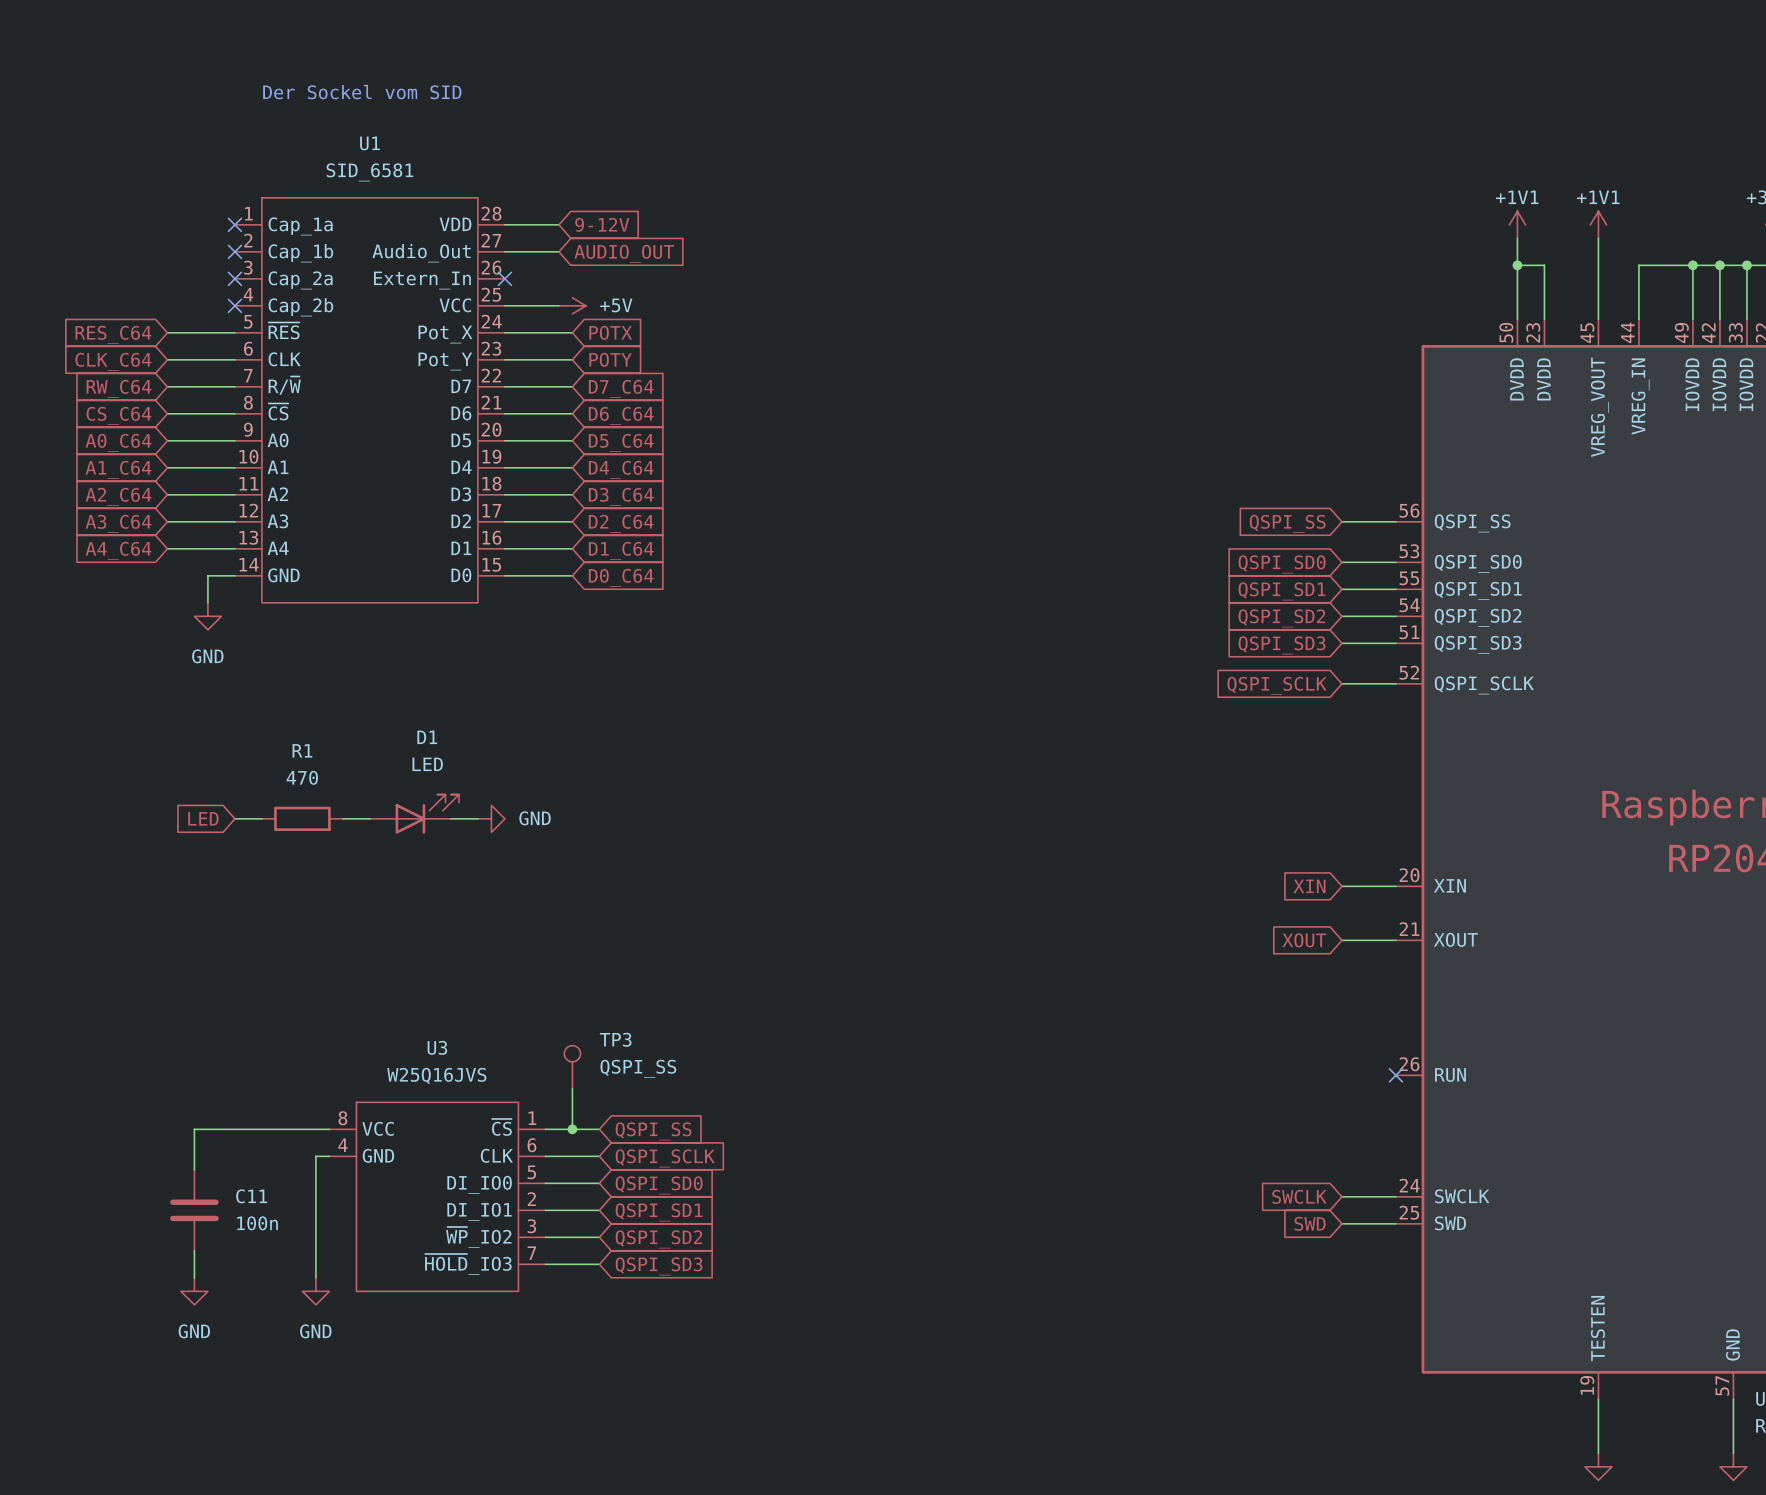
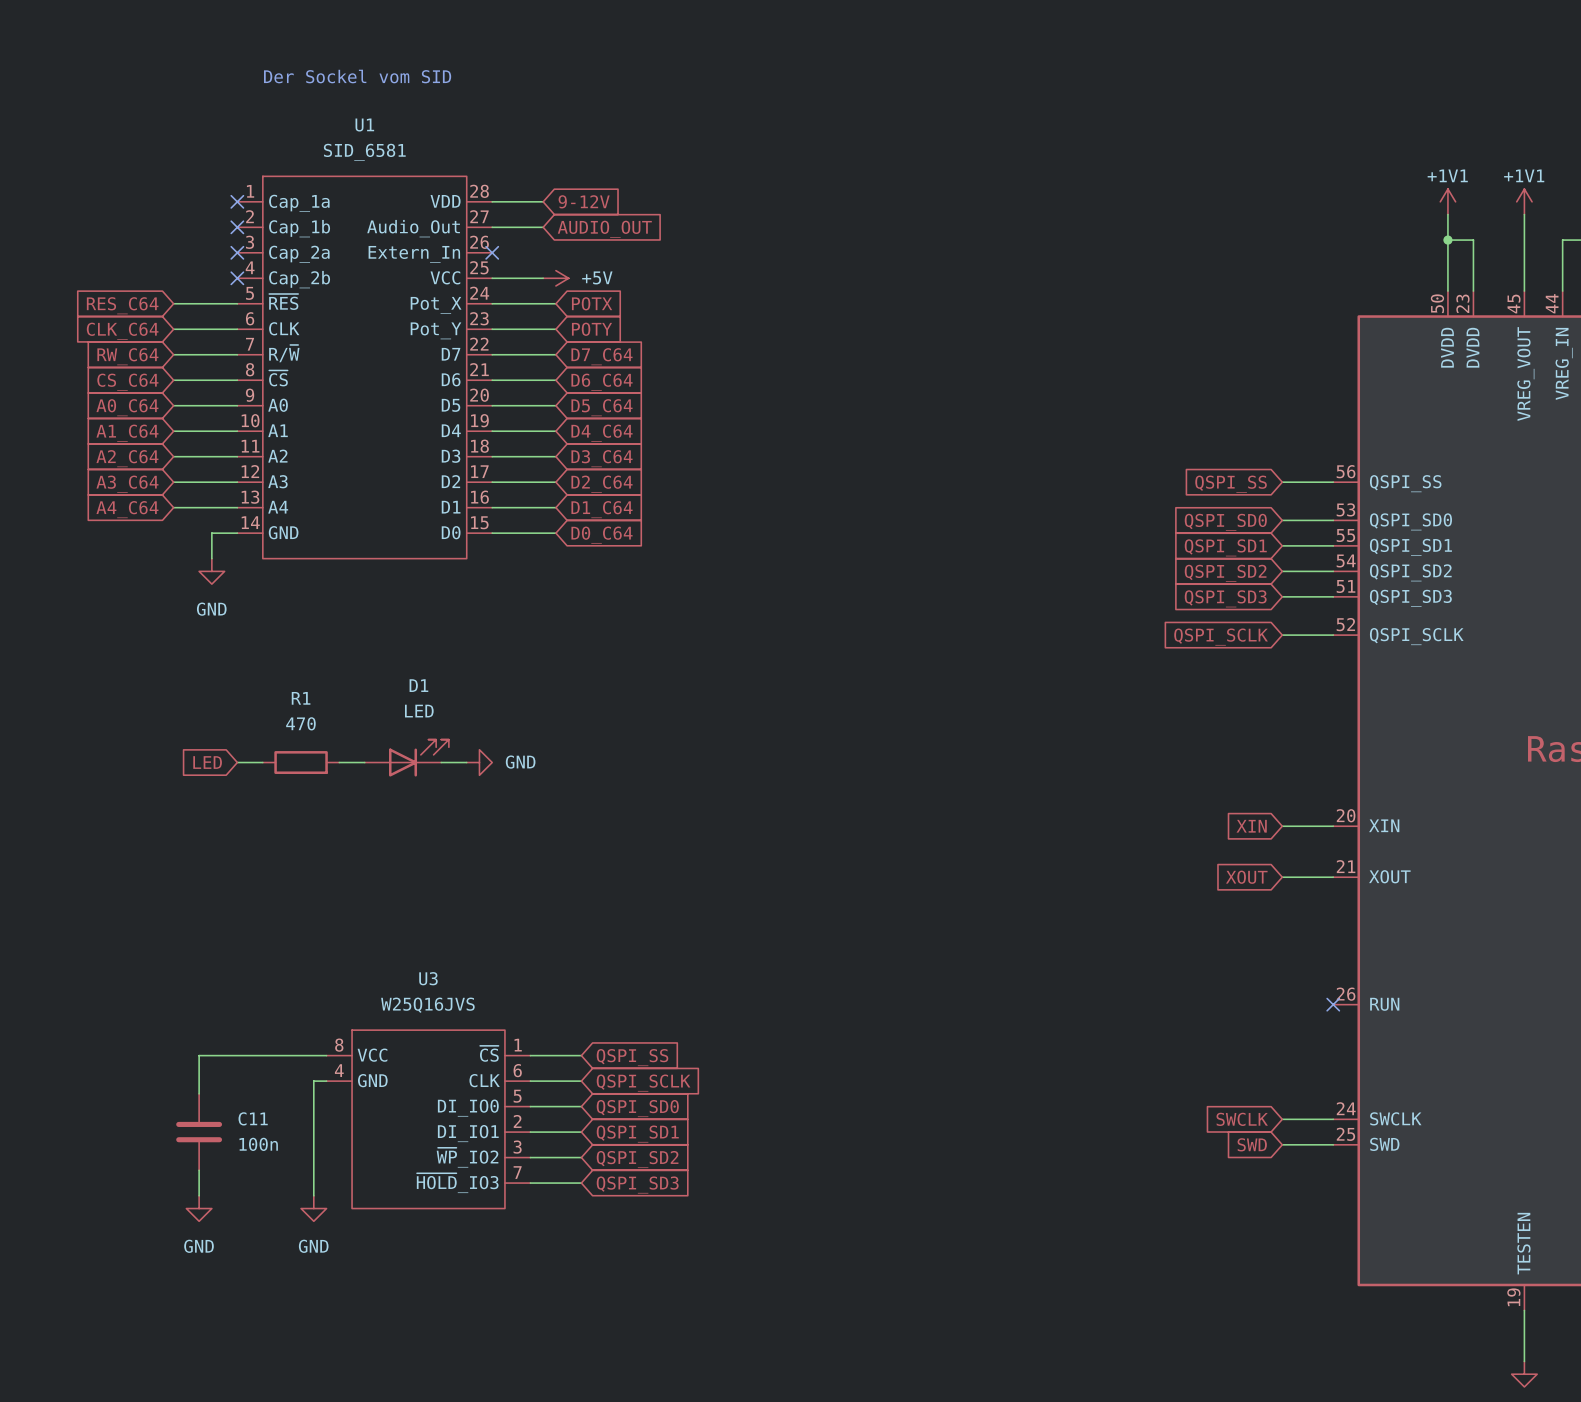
TP3: QSPI_SS (572, 1067) -> none
wire: (572, 1088) (572, 1129) -> none
junction: (572, 1129) -> none

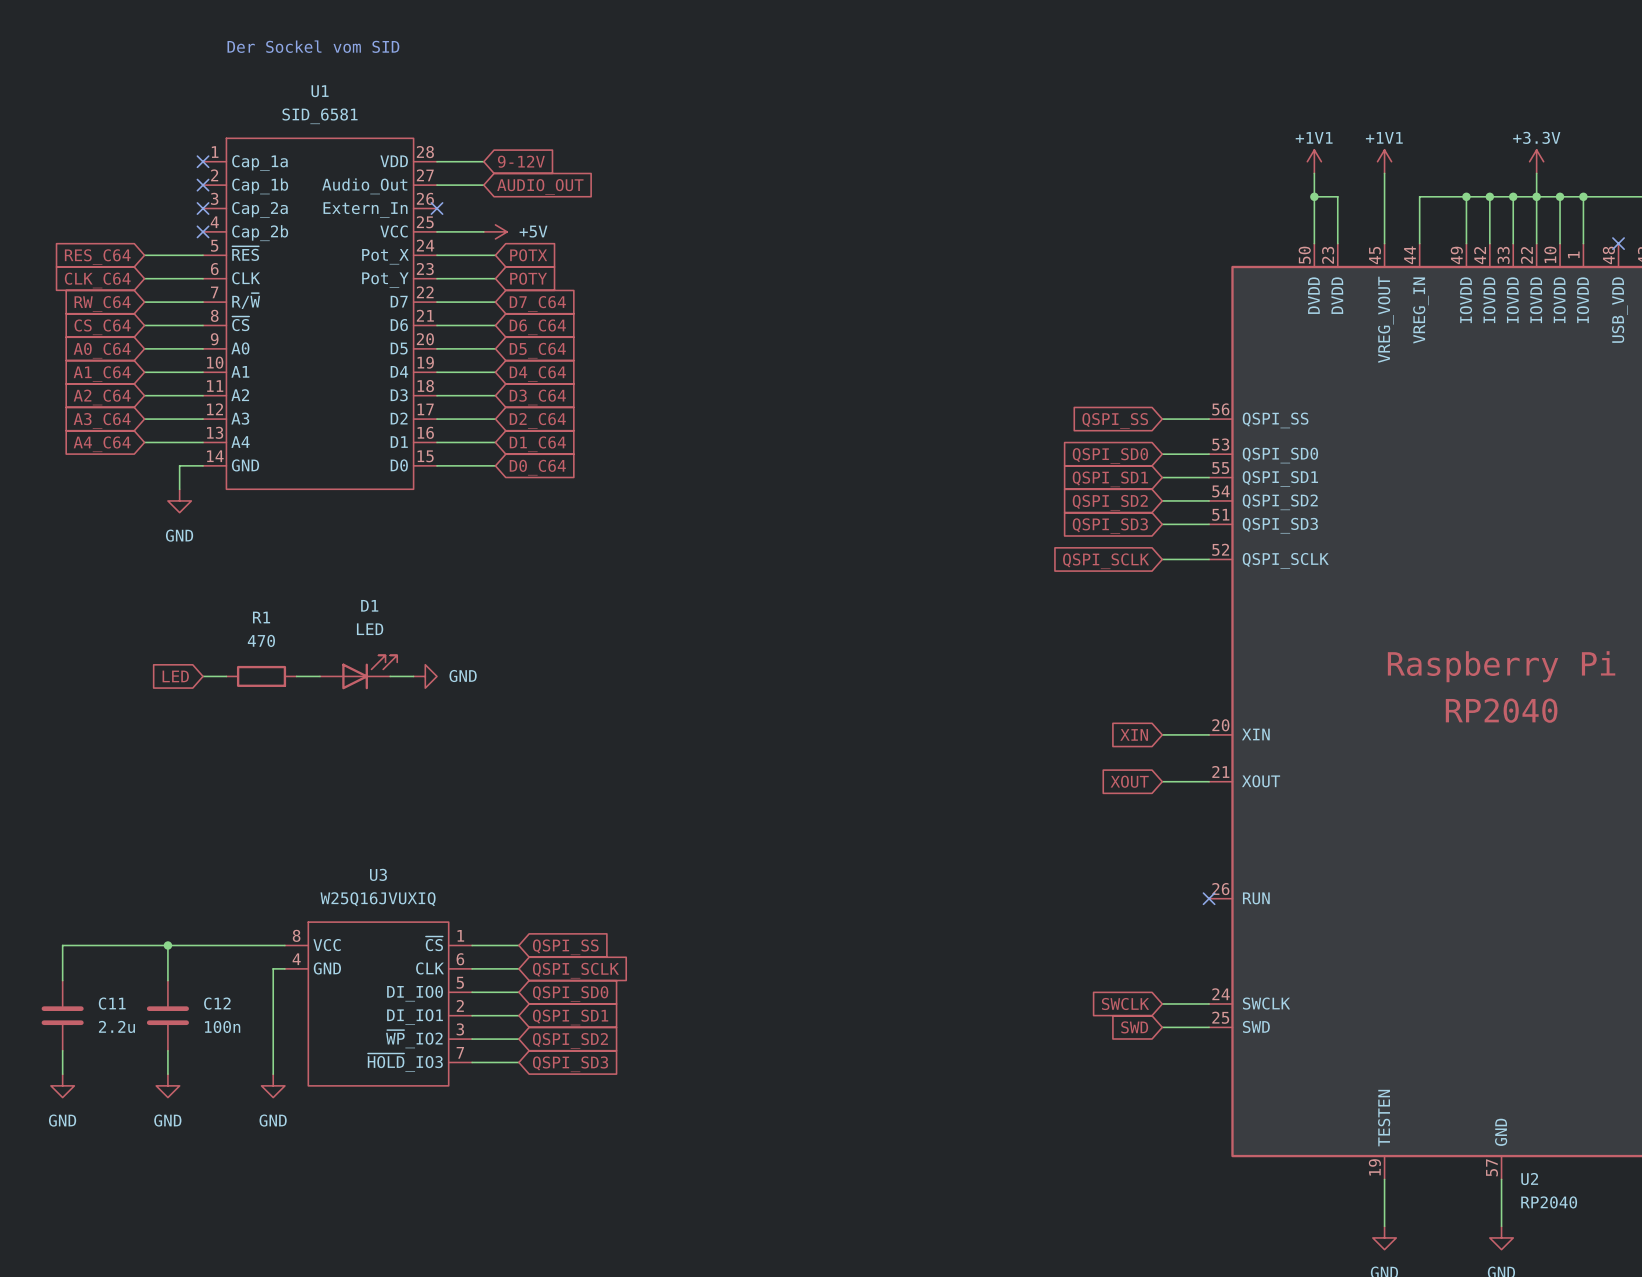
U3 value: W25Q16JVS (427, 1005) -> W25Q16JVUXIQ (378, 899)
wire: none -> (167, 945) (62, 945) (62, 980)
junction: none -> (167, 945)
C11 name: C11 (253, 1118) -> C12 (217, 1003)
C11: none -> 2.2u (62, 1015)
wire: none -> (62, 1050) (62, 1074)
power symbol: none -> GND (62, 1085)

